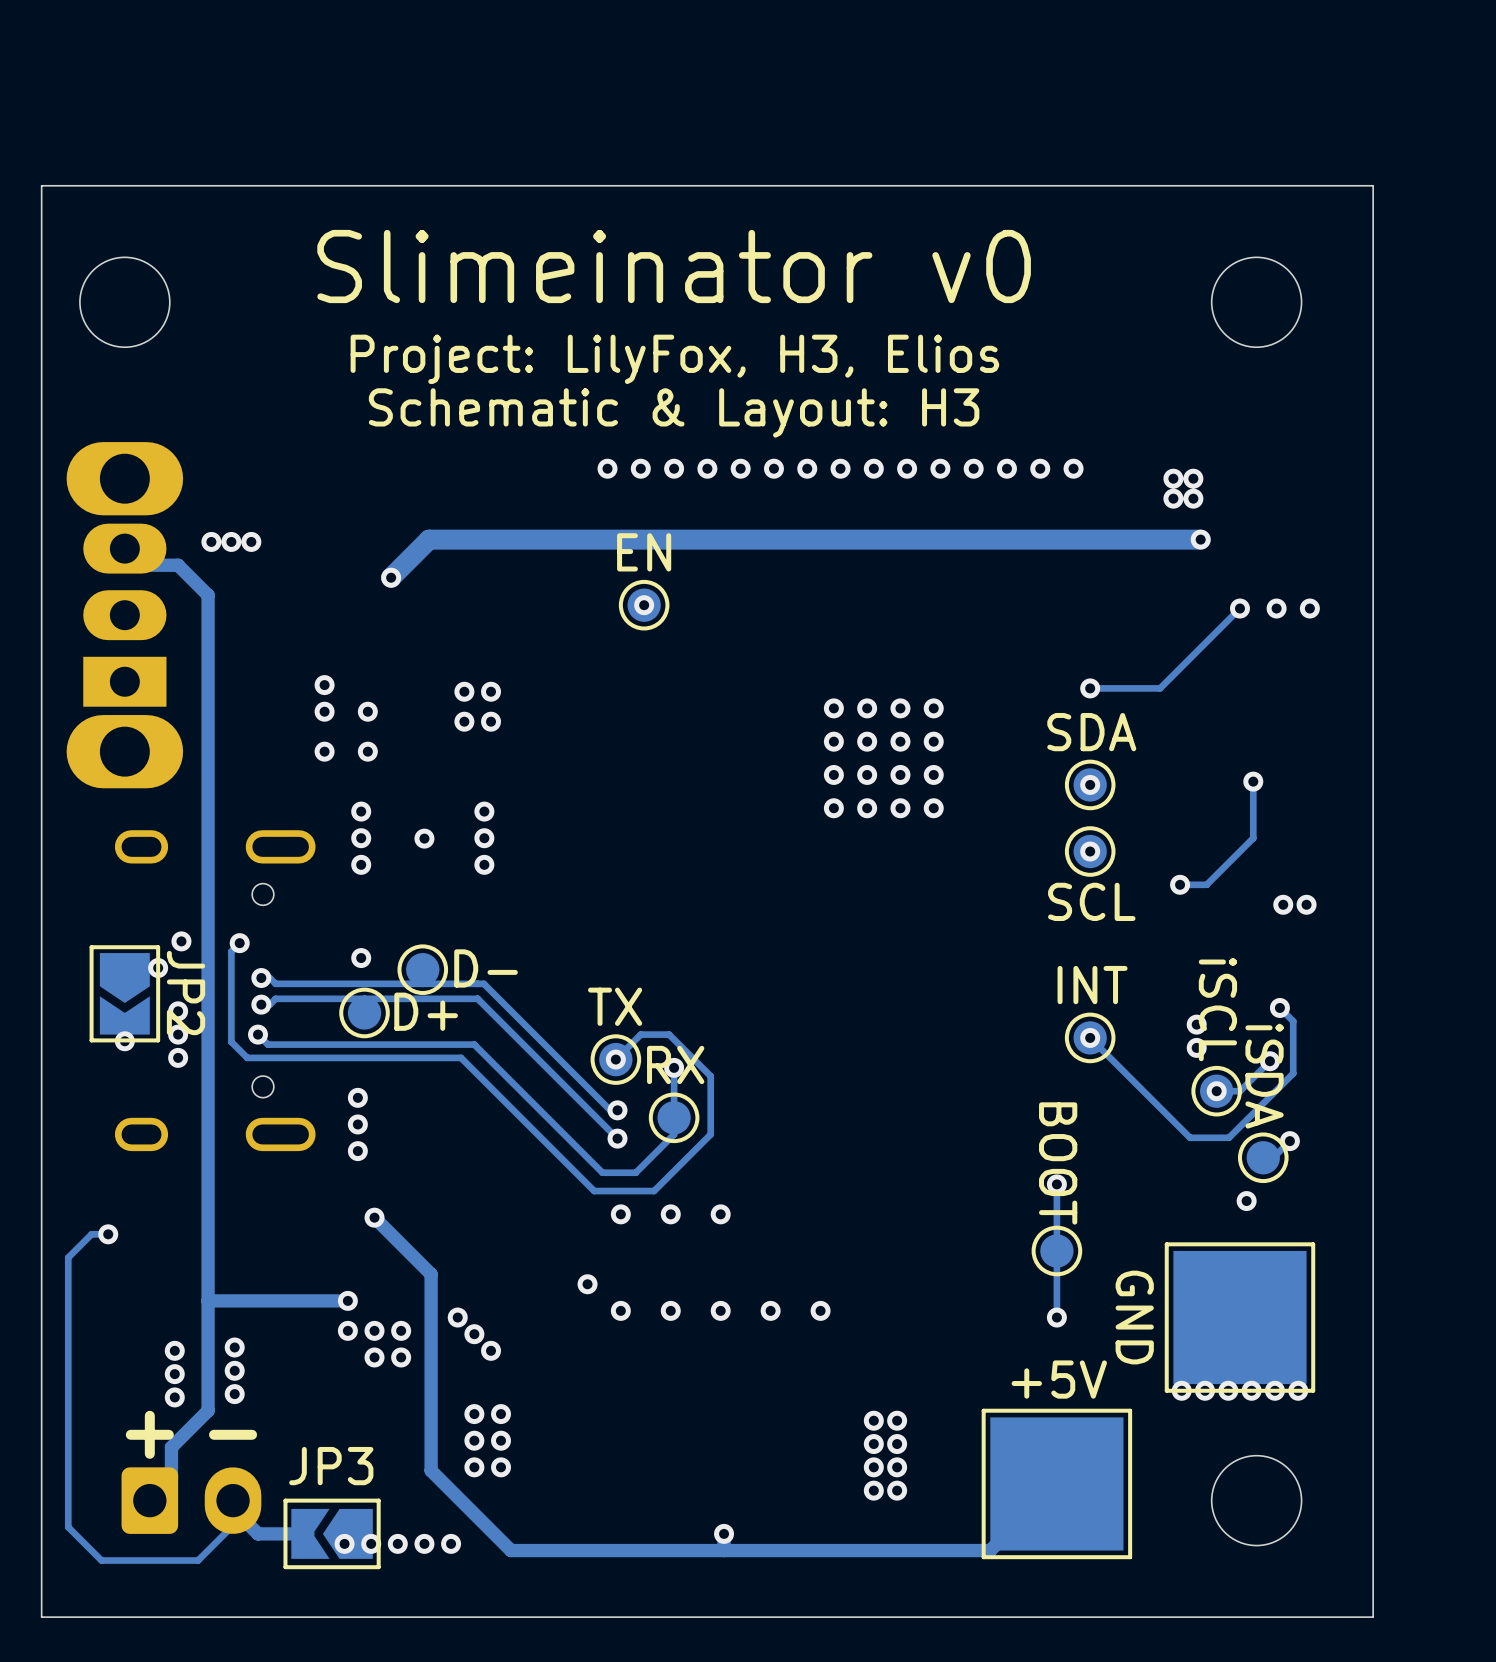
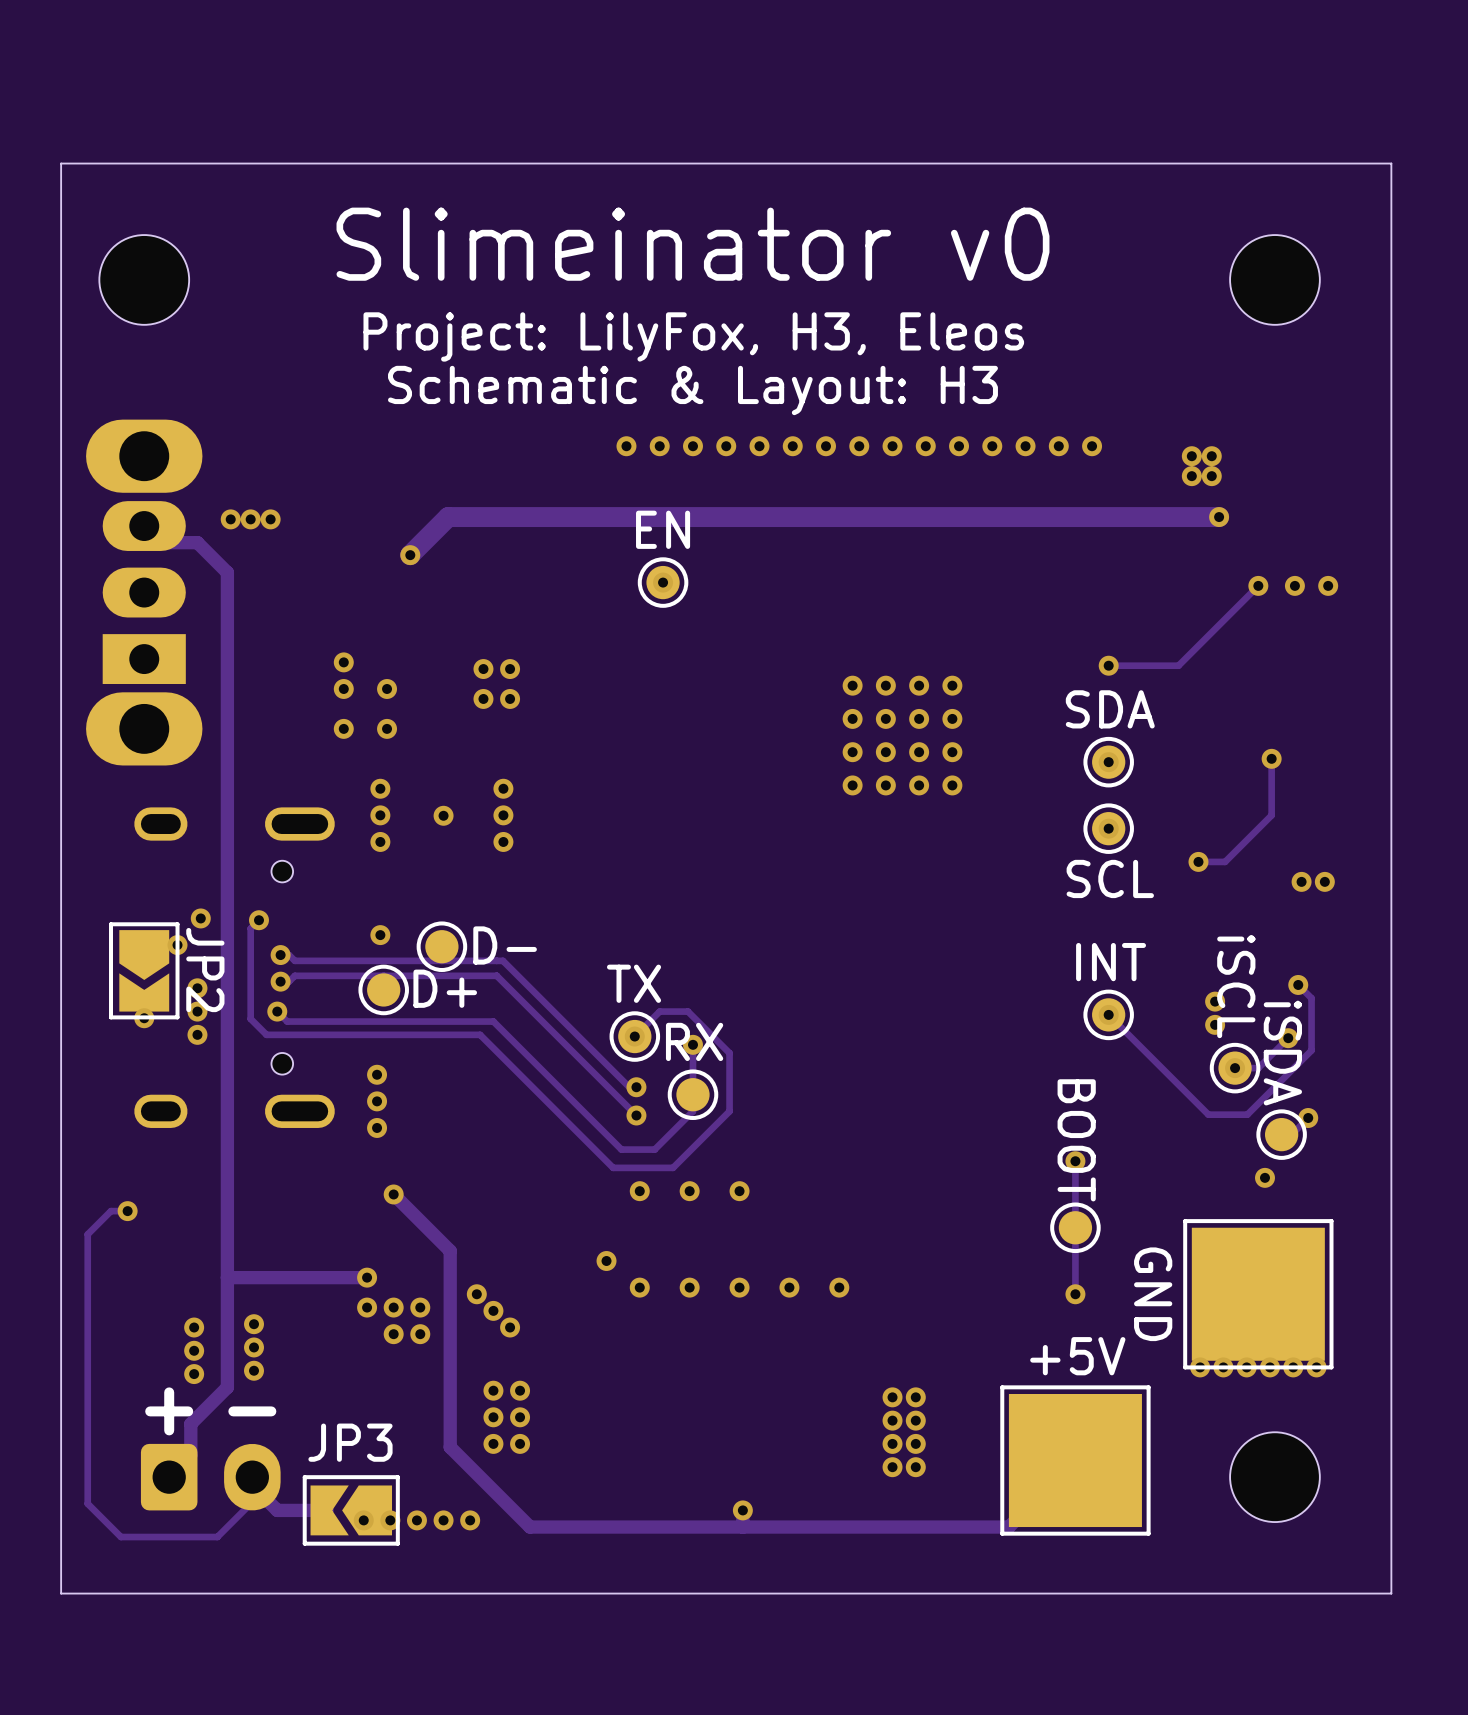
text: Project: LilyFox, H3, Elios (674, 359) -> Project: LilyFox, H3, Eleos (693, 336)

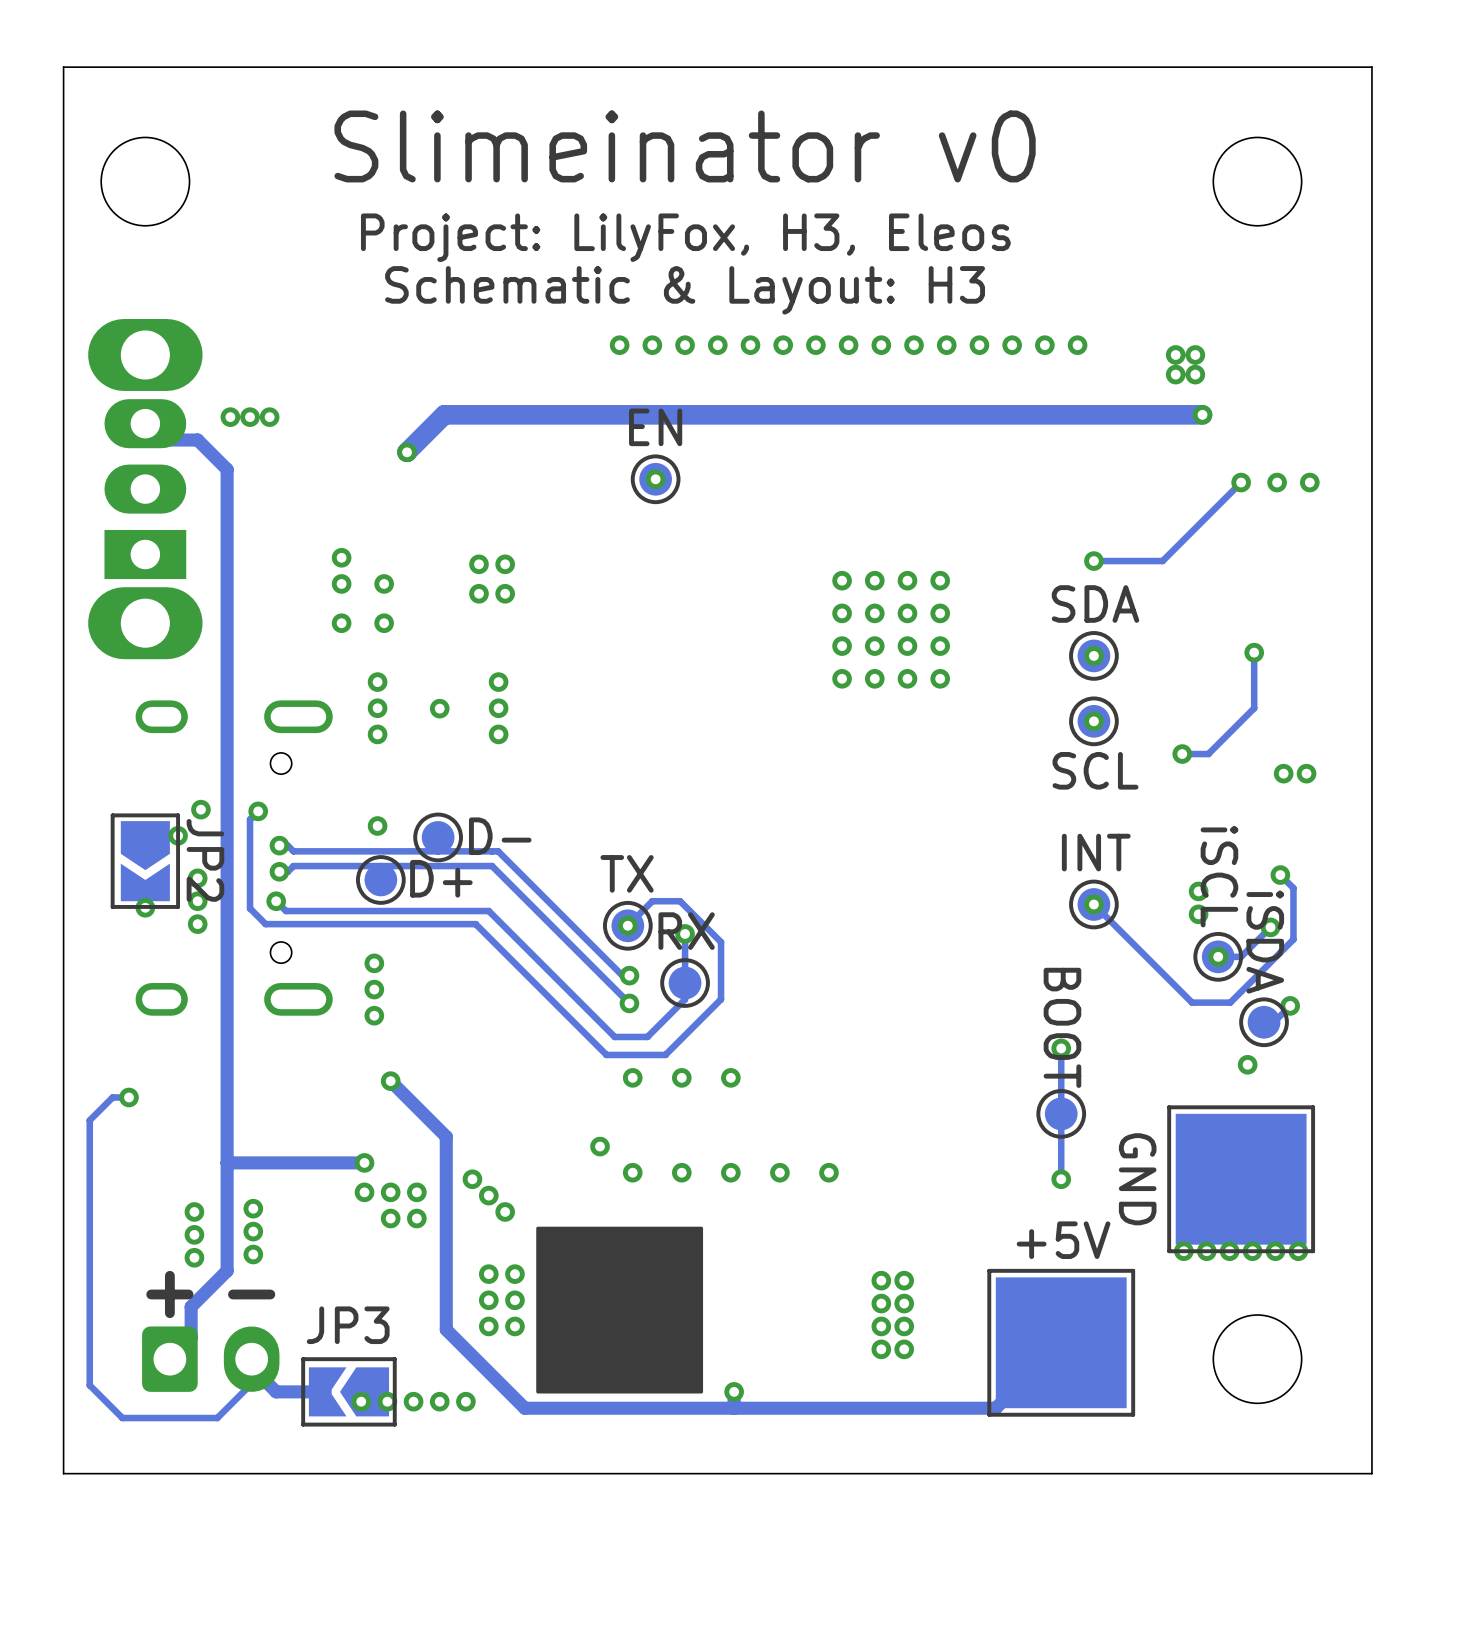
drawing: none -> [536, 1226, 704, 1394]

